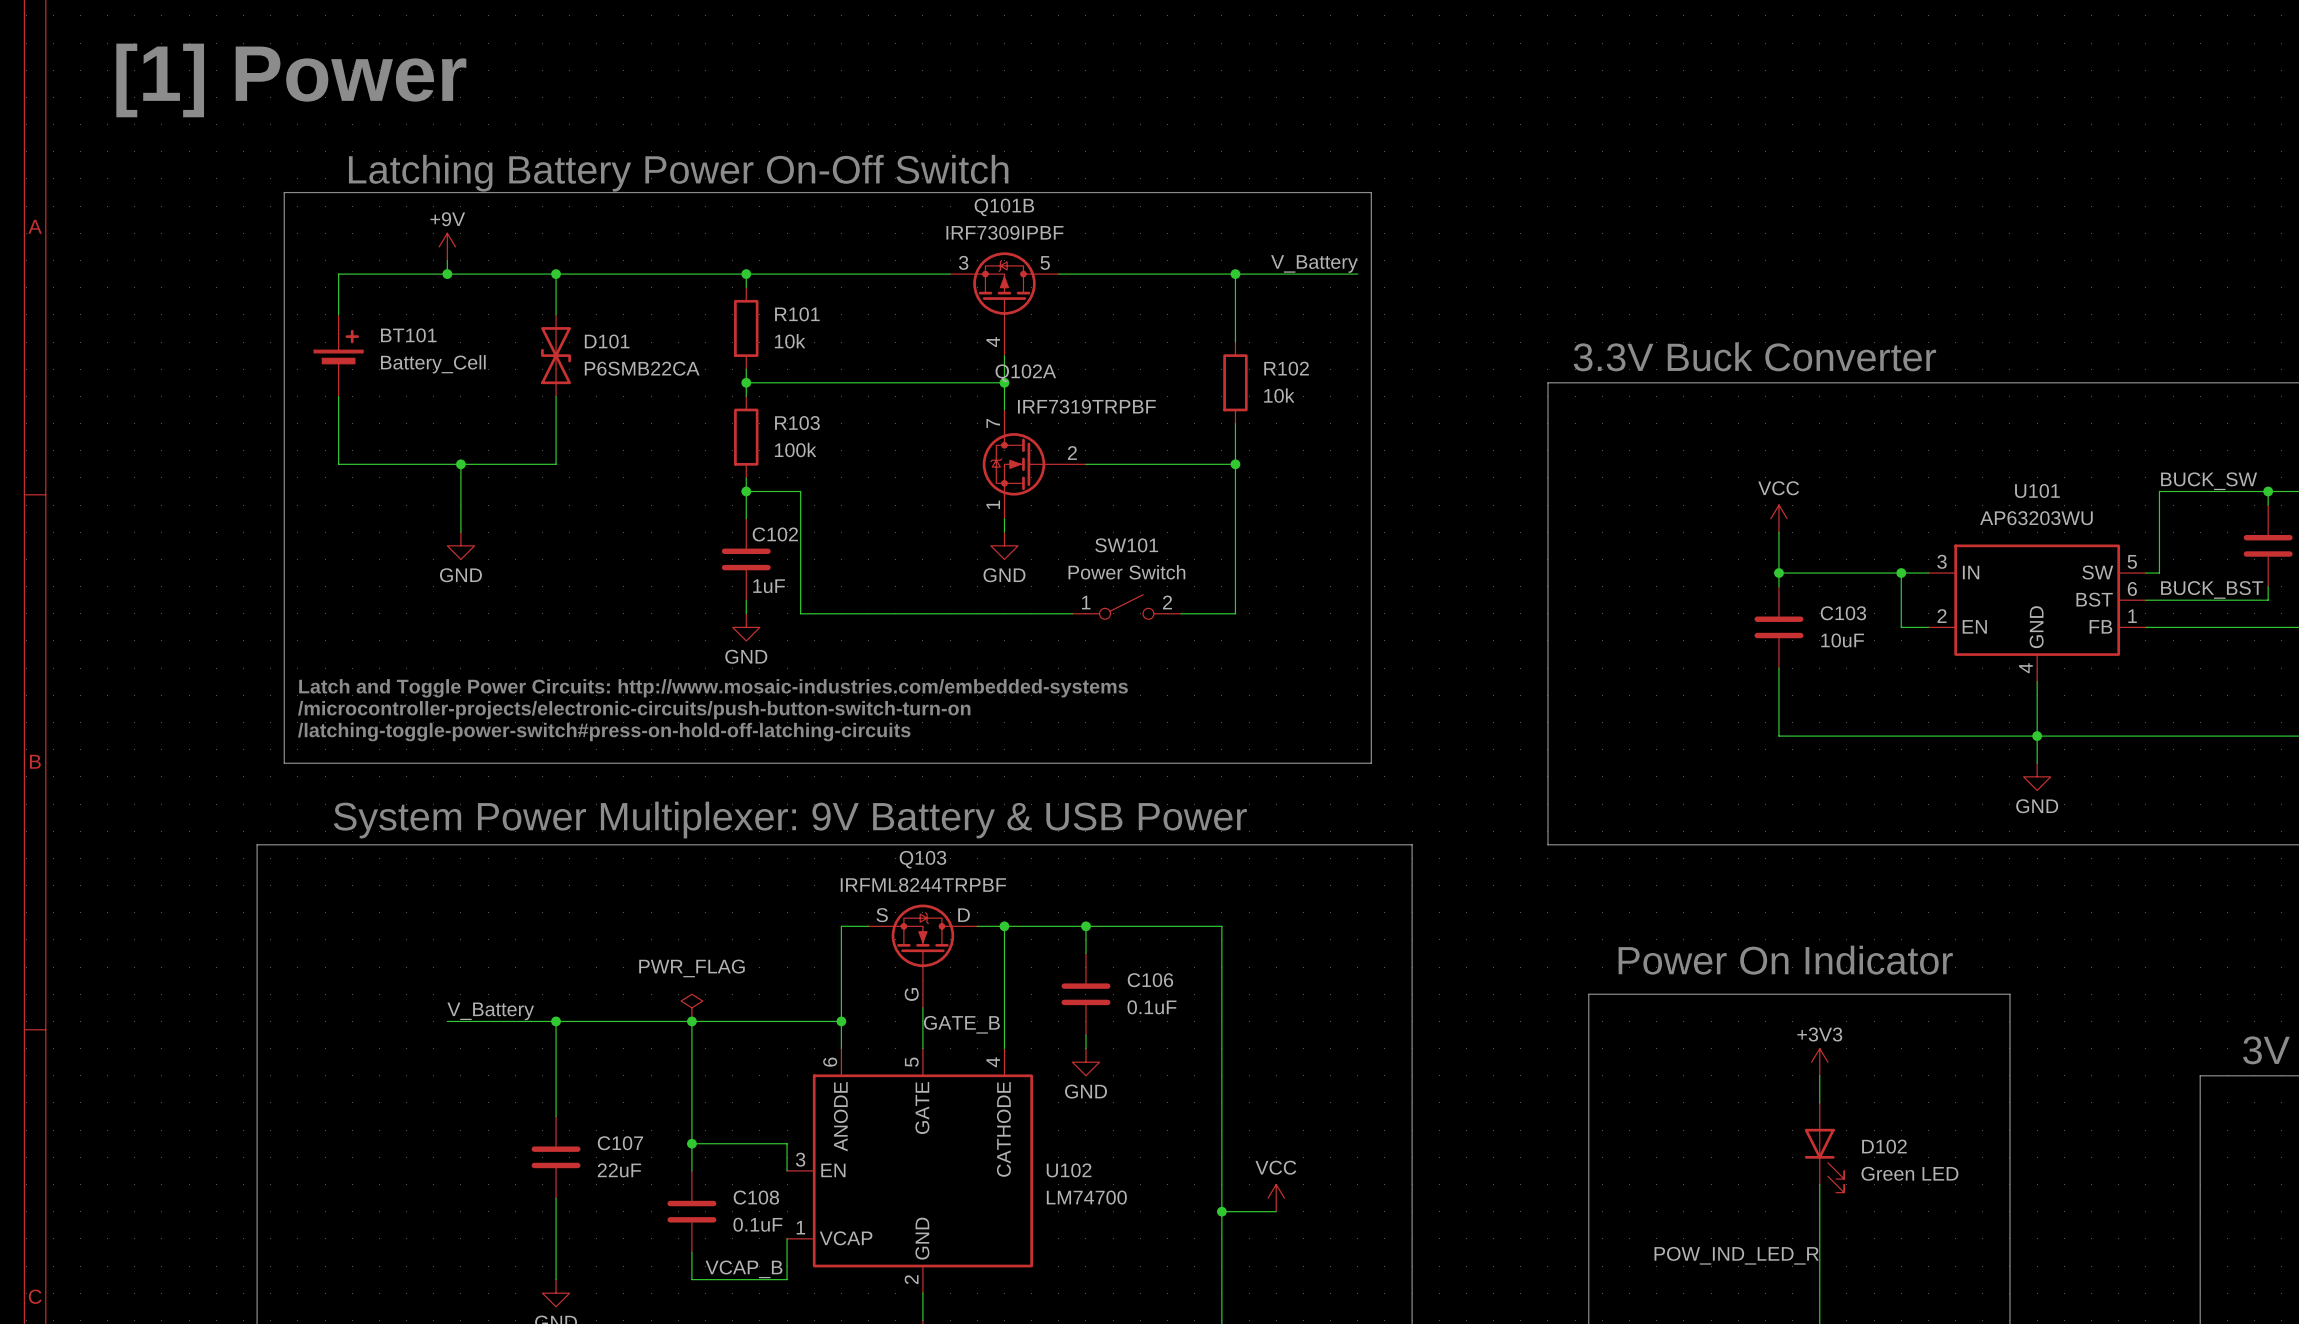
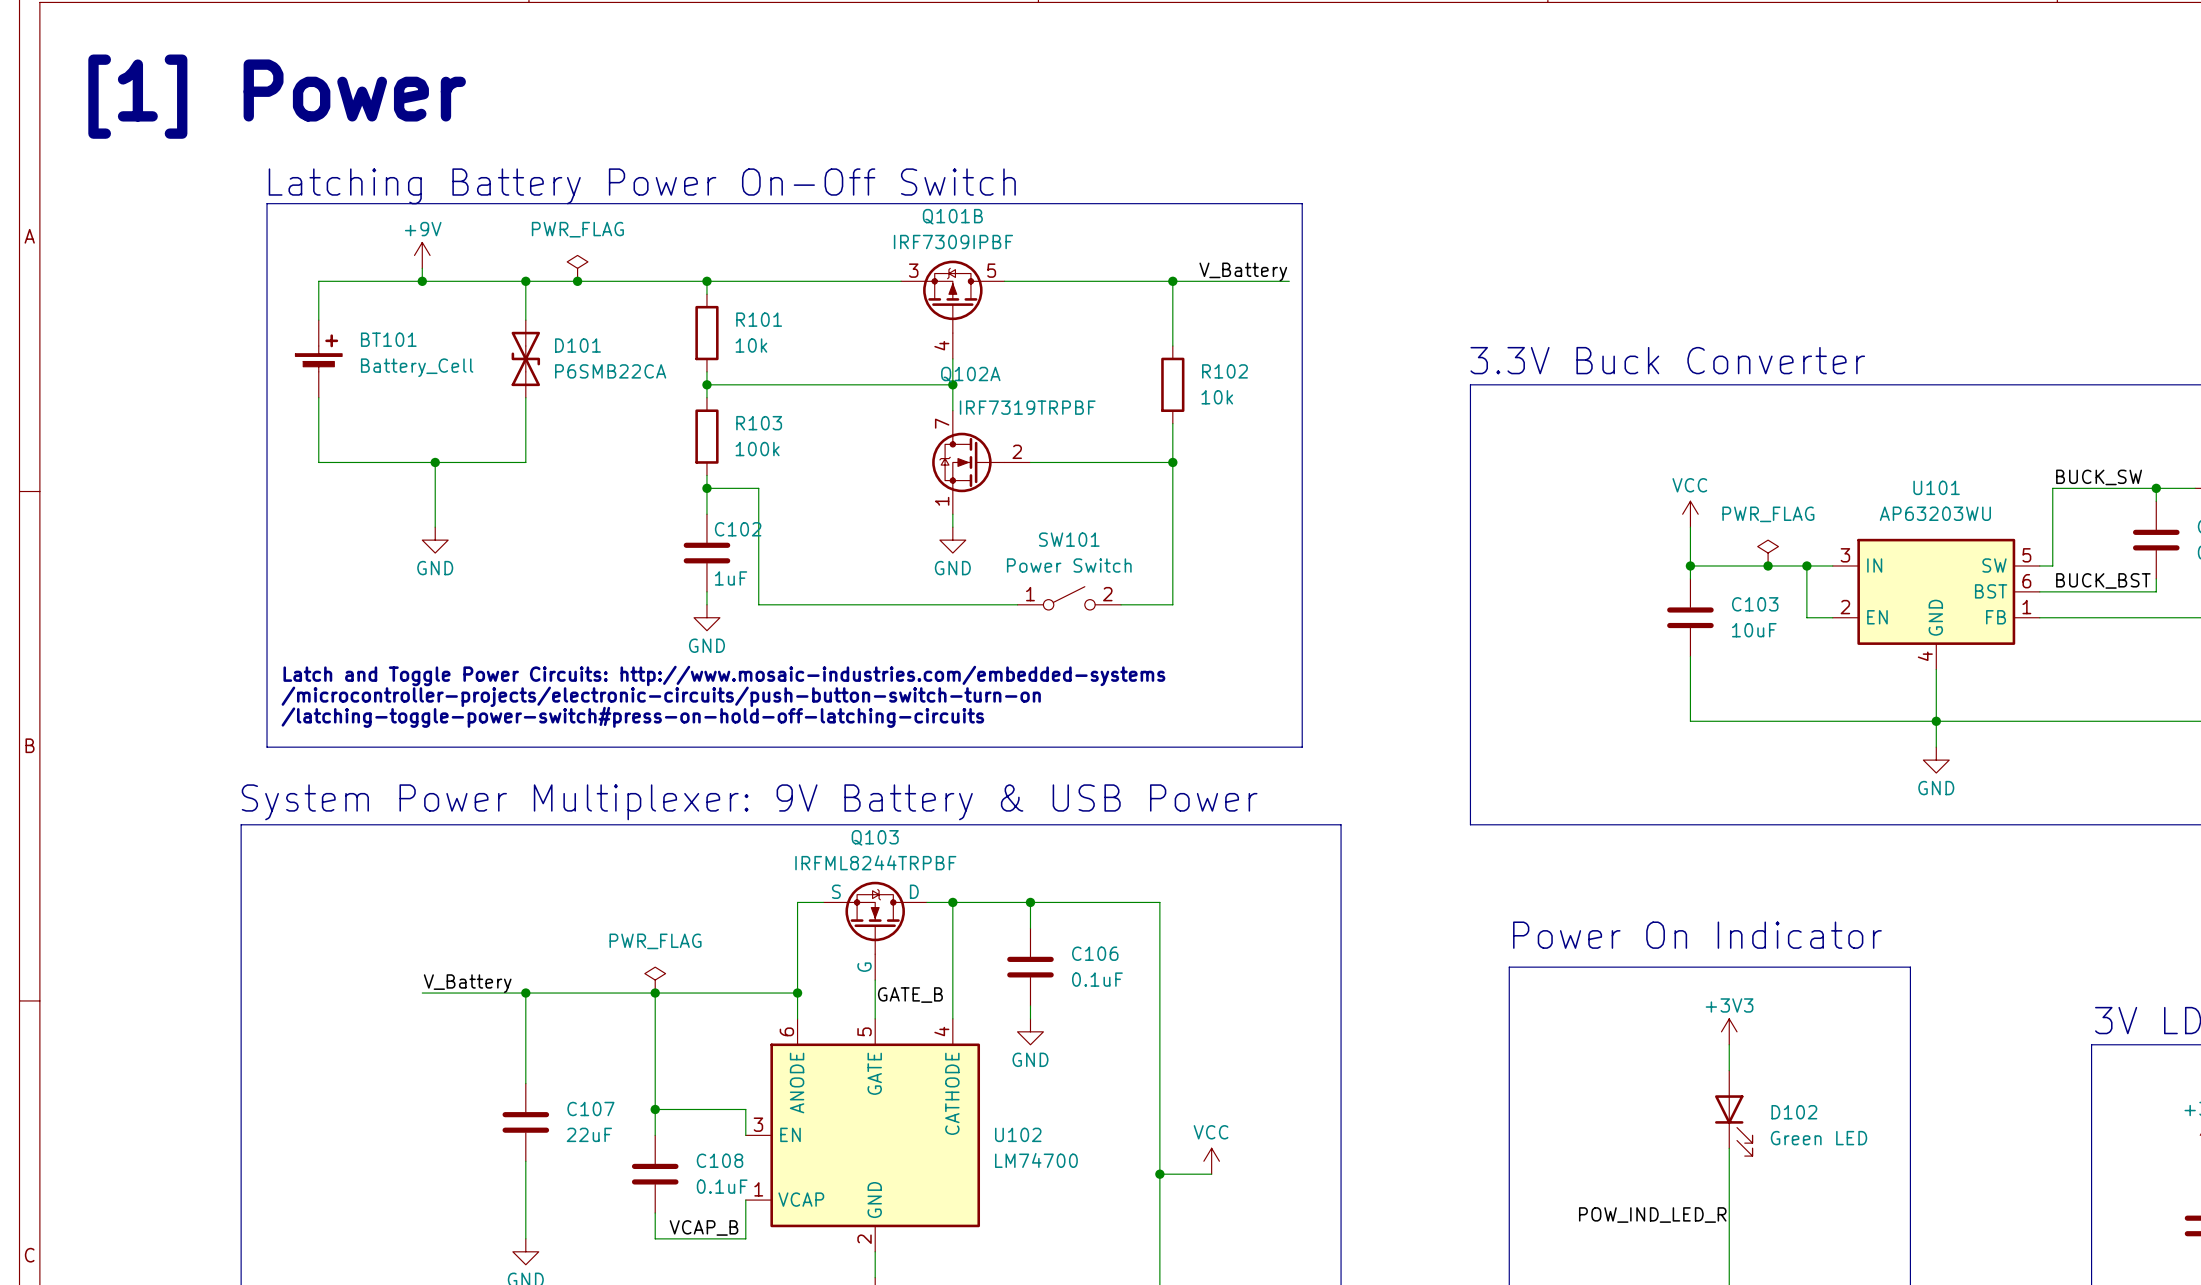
power symbol: none -> PWR_FLAG (577, 268)
junction: none -> (577, 281)
power symbol: none -> PWR_FLAG (1768, 553)
junction: none -> (1768, 565)

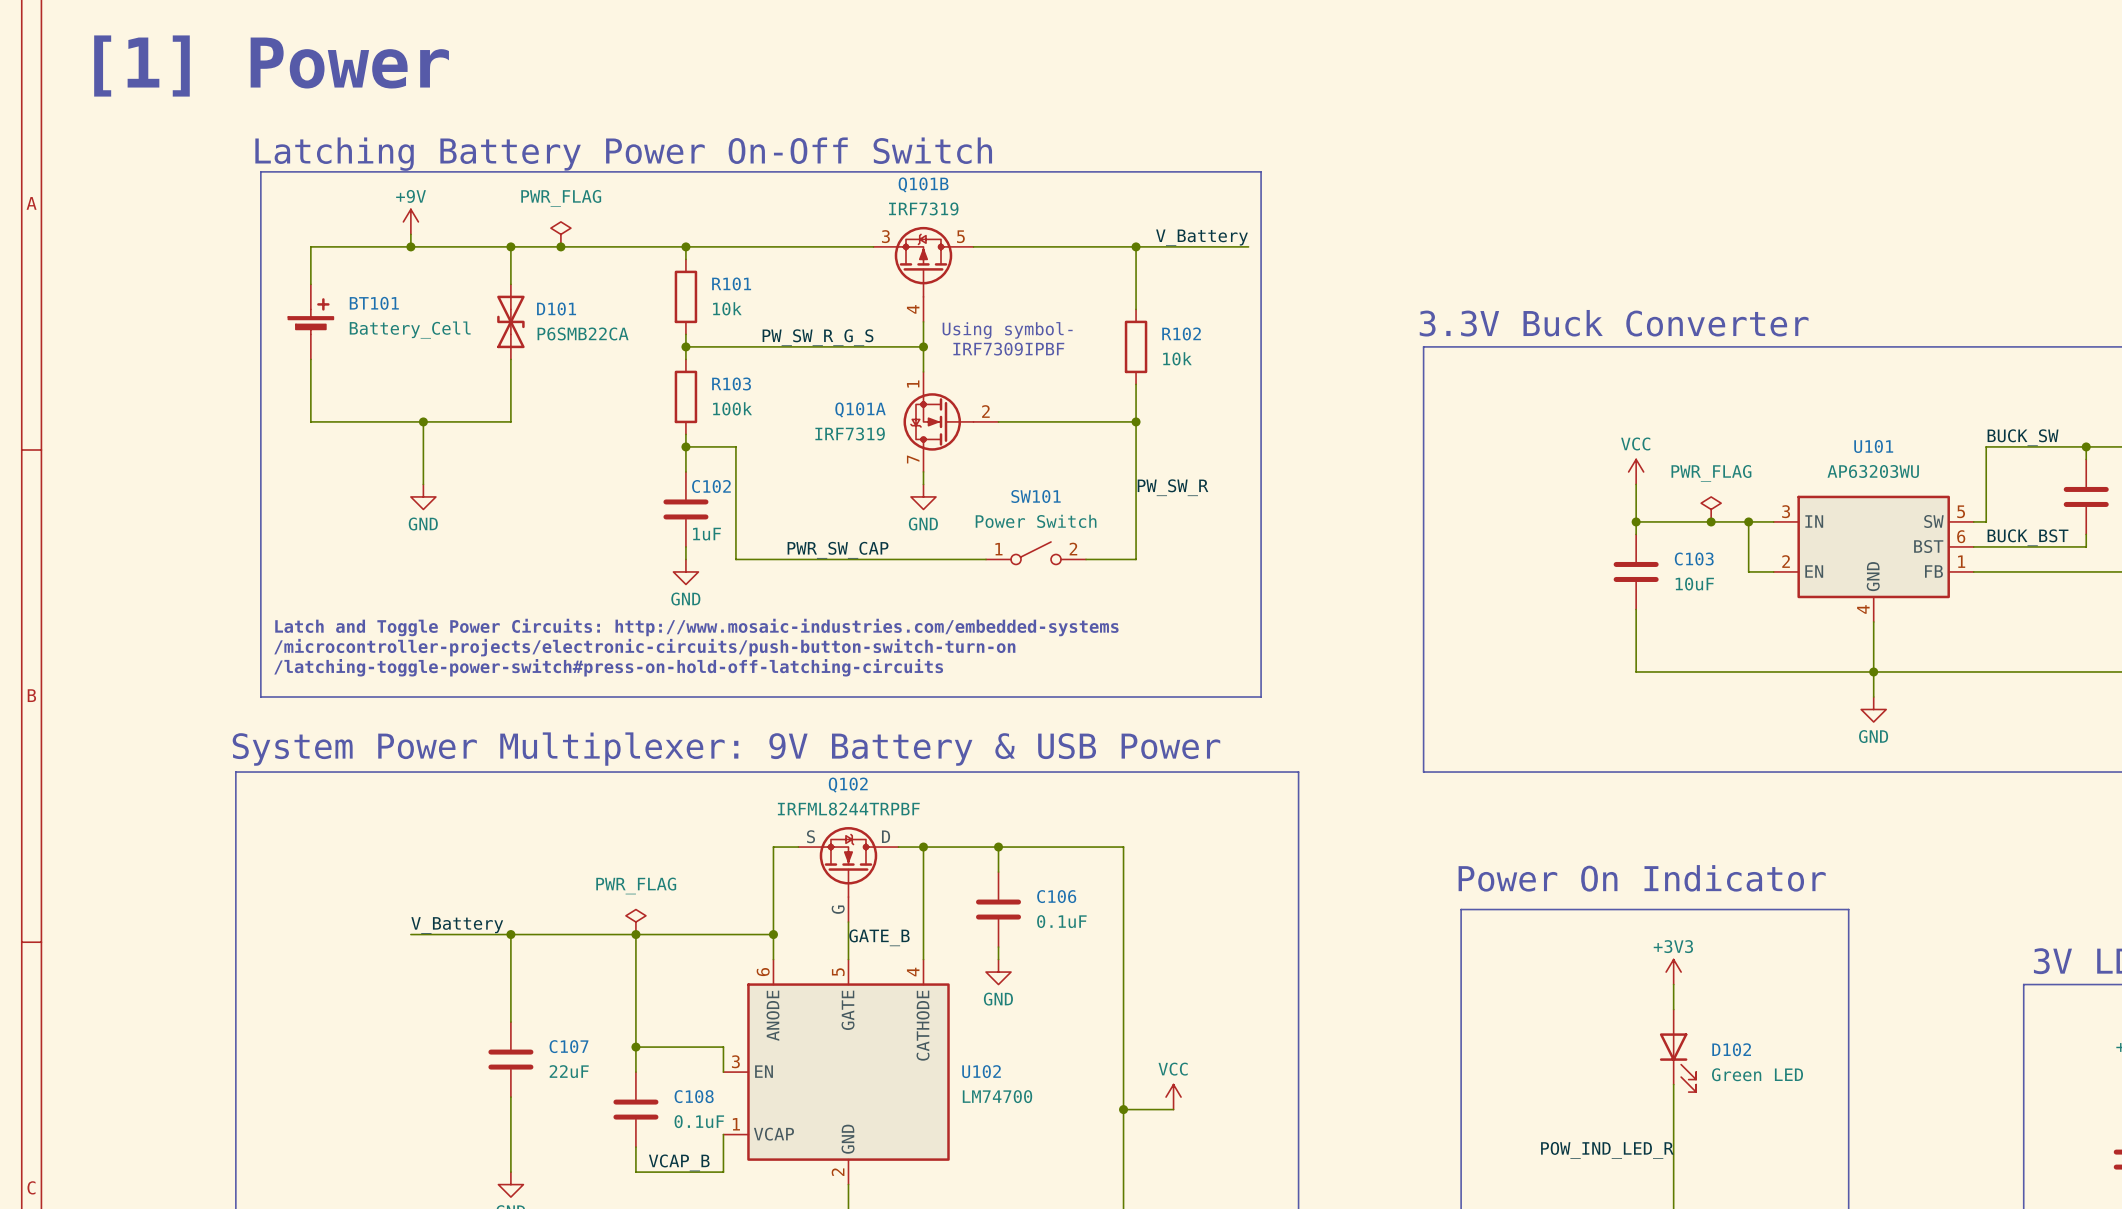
Q101B value: IRF7309IPBF (953, 242) -> IRF7319 (923, 208)
text: none -> Using symbol- (1007, 330)
label: none -> PW_SW_R_G_S (818, 337)
text: none -> IRF7309IPBF (1008, 349)
Q102A: IRF7319TRPBF (981, 462) -> none
Q101A: none -> IRF7319 (951, 421)
label: none -> PW_SW_R (1173, 487)
label: none -> PWR_SW_CAP (838, 550)
Q103 name: Q103 (875, 837) -> Q102 (848, 785)

